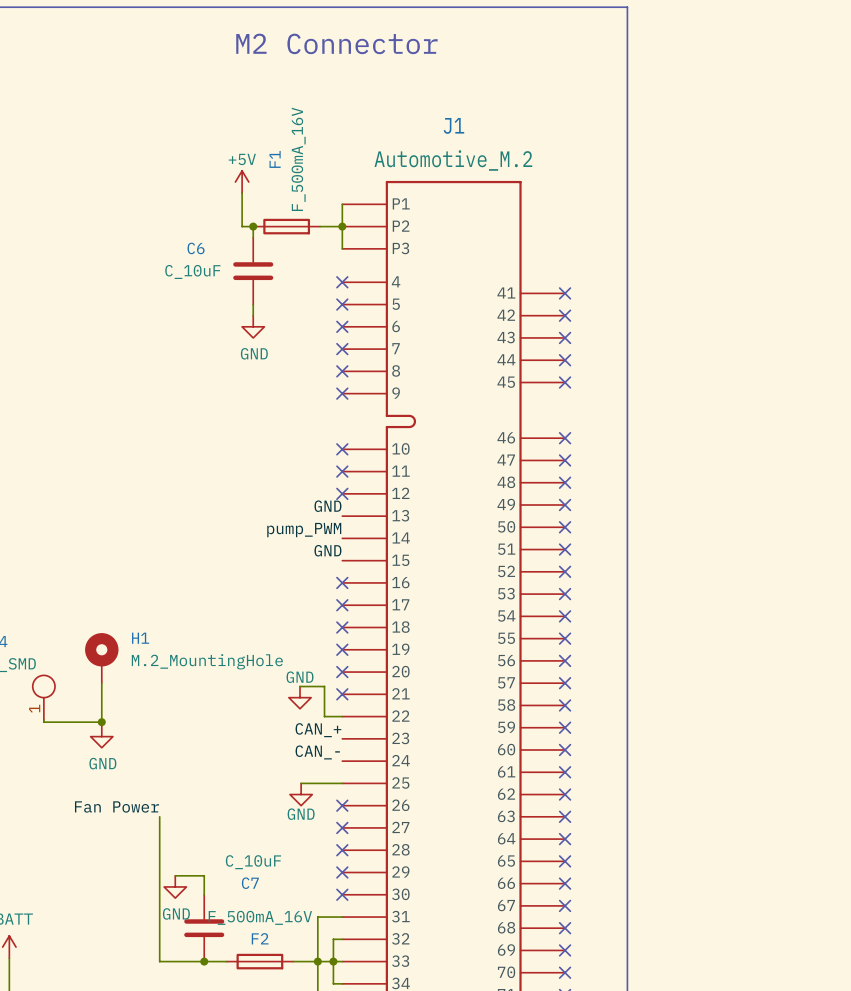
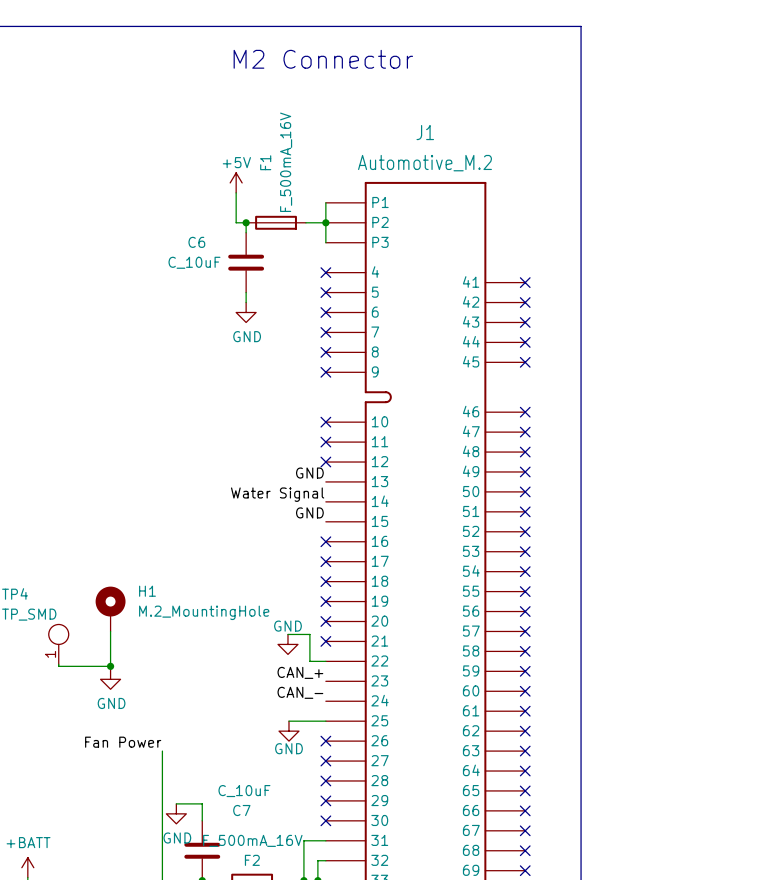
label: pump_PWM (304, 530) -> Water Signal (277, 494)

